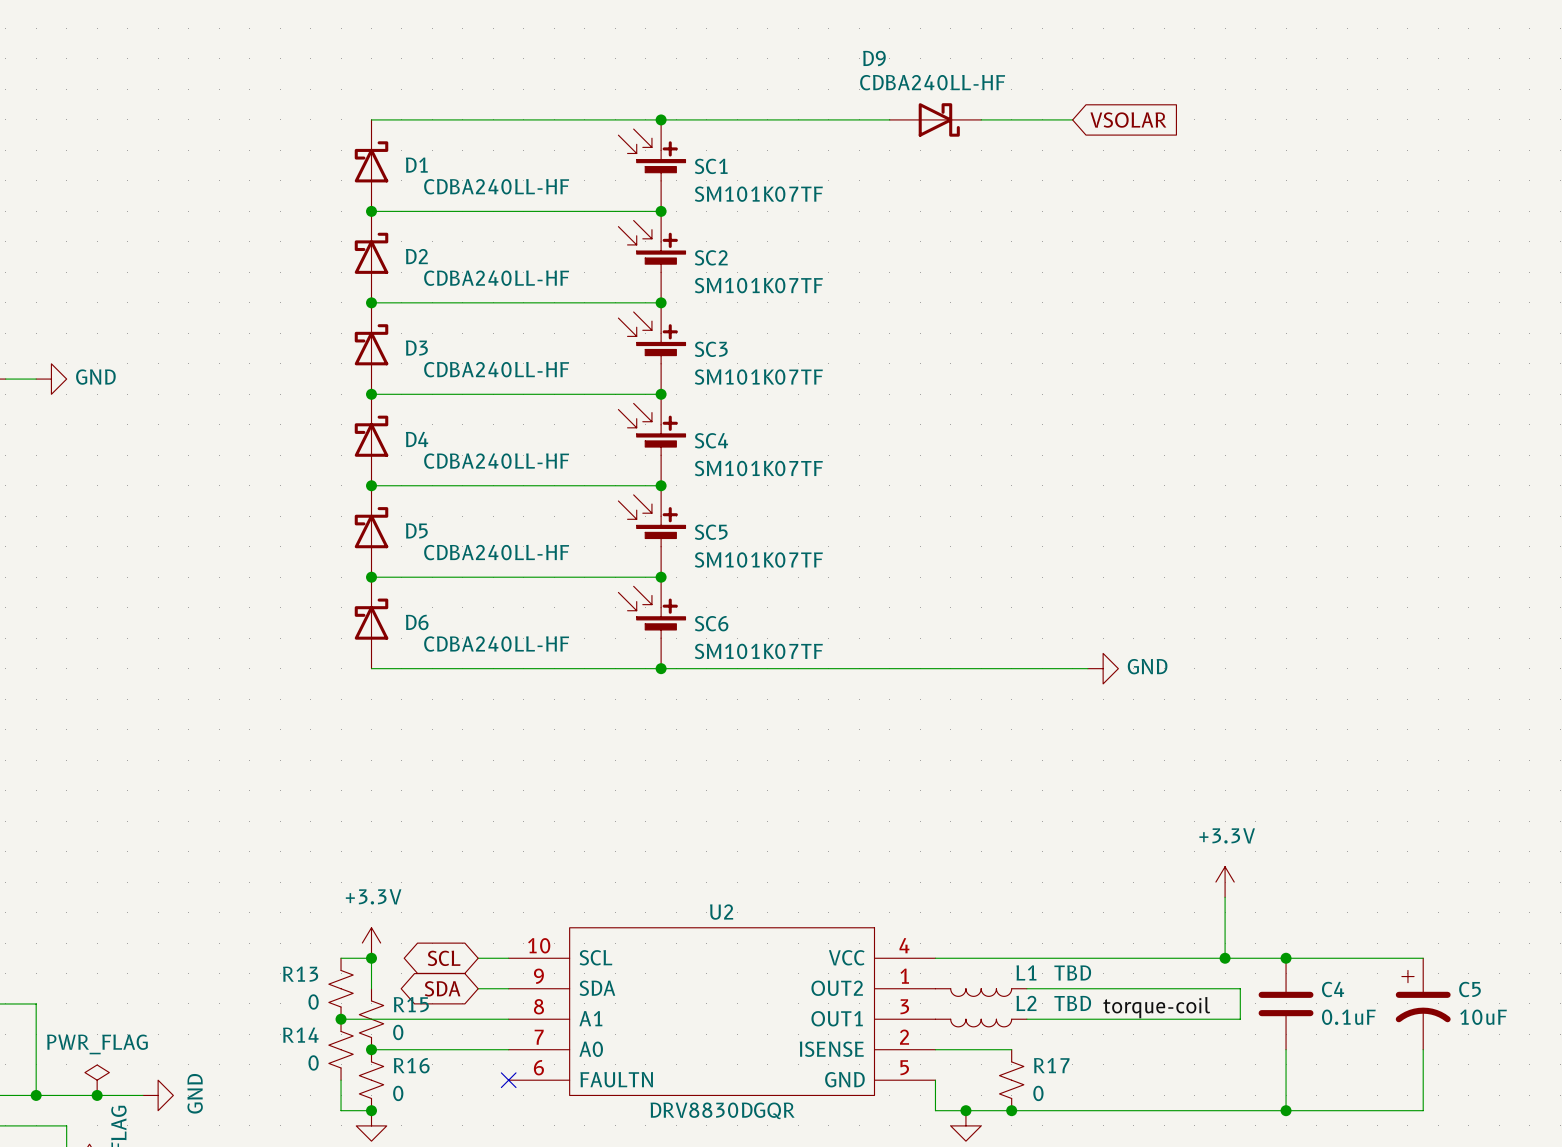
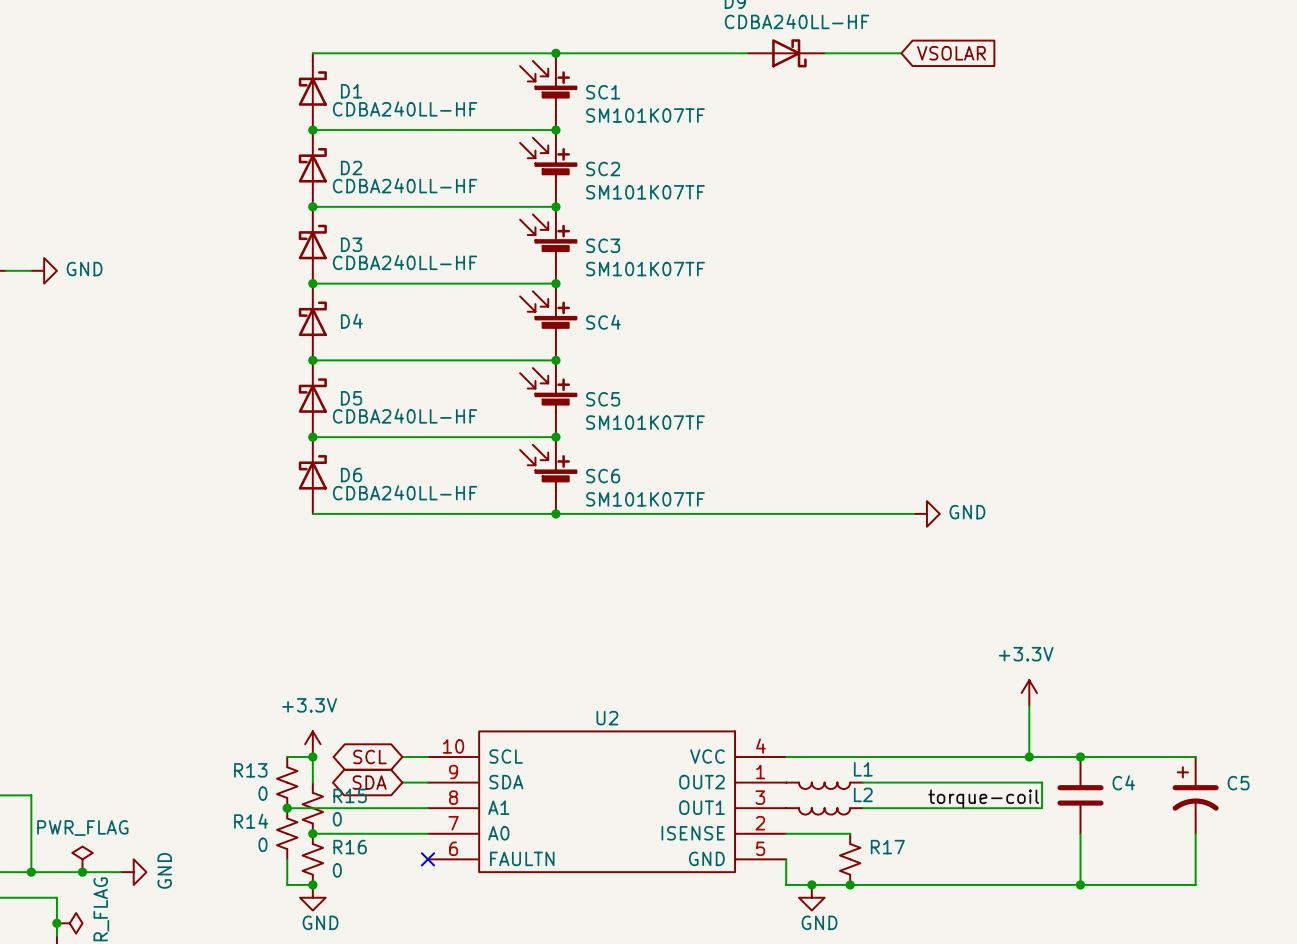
D4 value: CDBA240LL-HF (496, 461) -> none
SC4 value: SM101K07TF (758, 468) -> none
L1 value: TBD (1072, 972) -> none
L2 value: TBD (1072, 1003) -> none
C4 value: 0.1uF (1348, 1017) -> none
C5 value: 10uF (1483, 1017) -> none
R17 value: 0 (1038, 1093) -> none
U2 value: DRV8830DGQR (722, 1110) -> none

